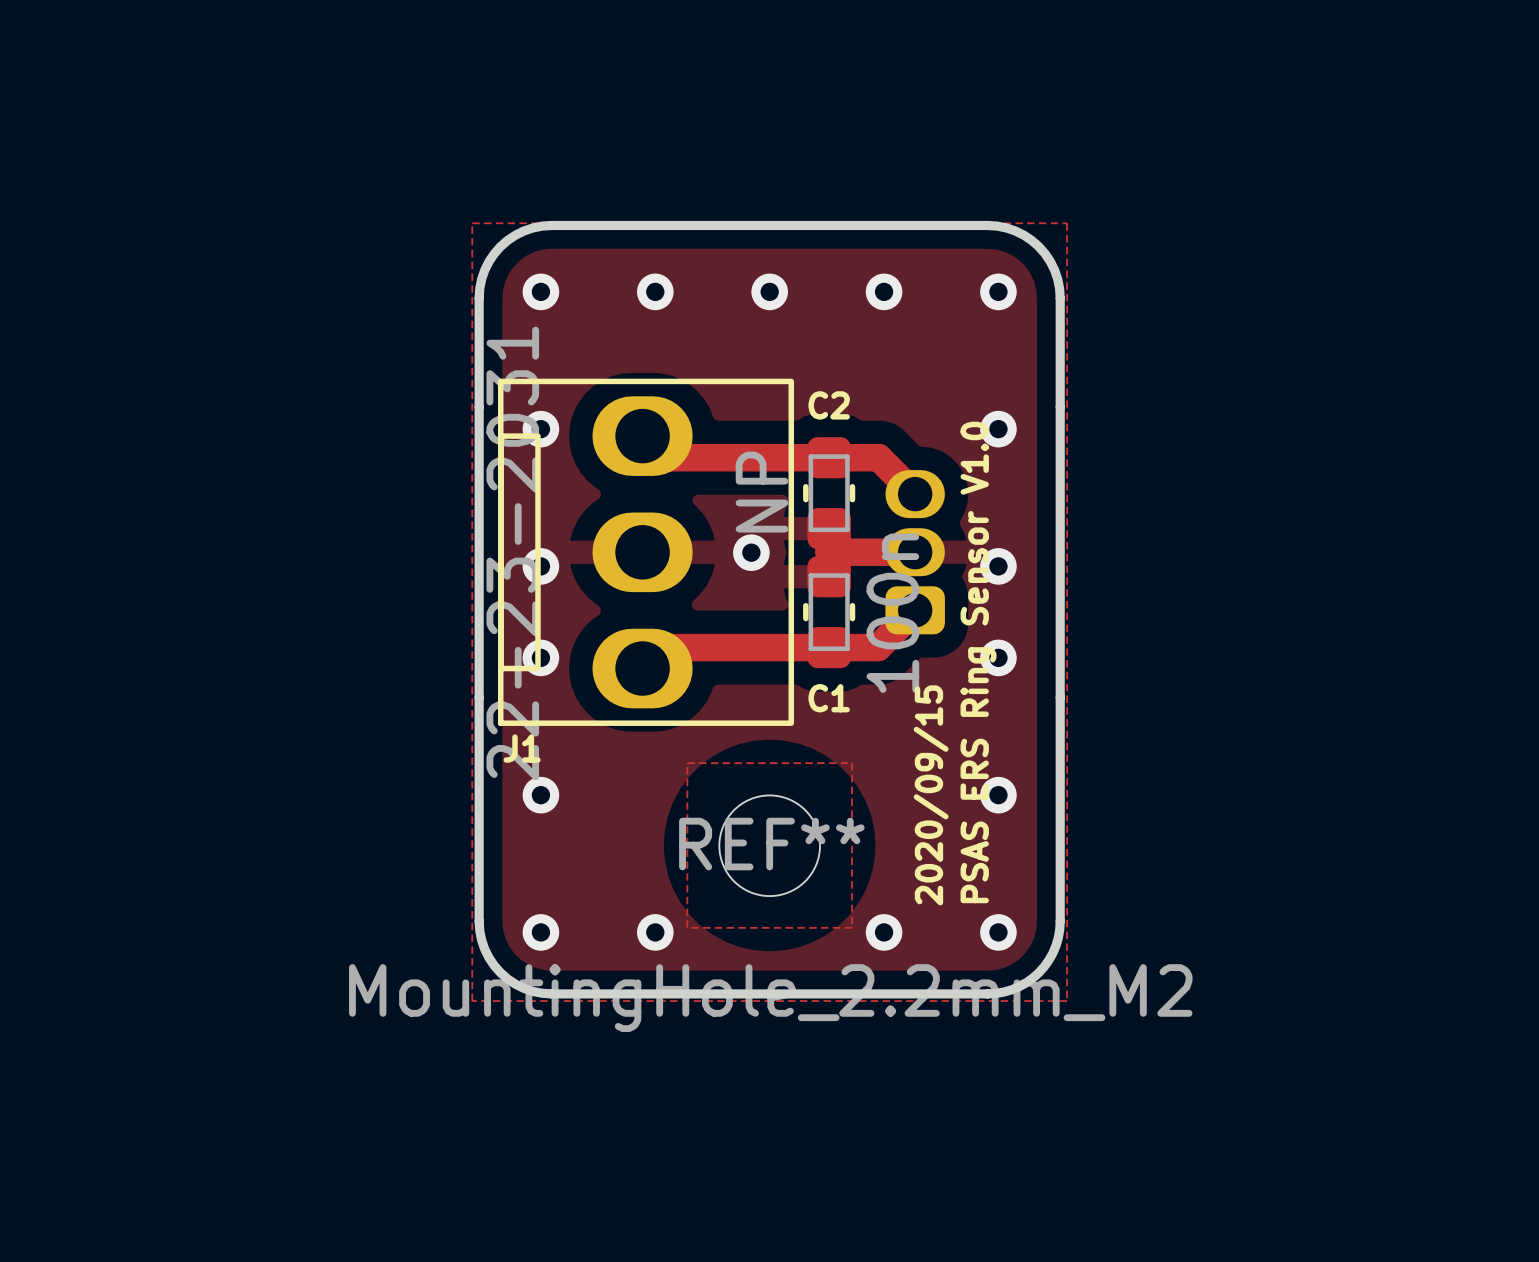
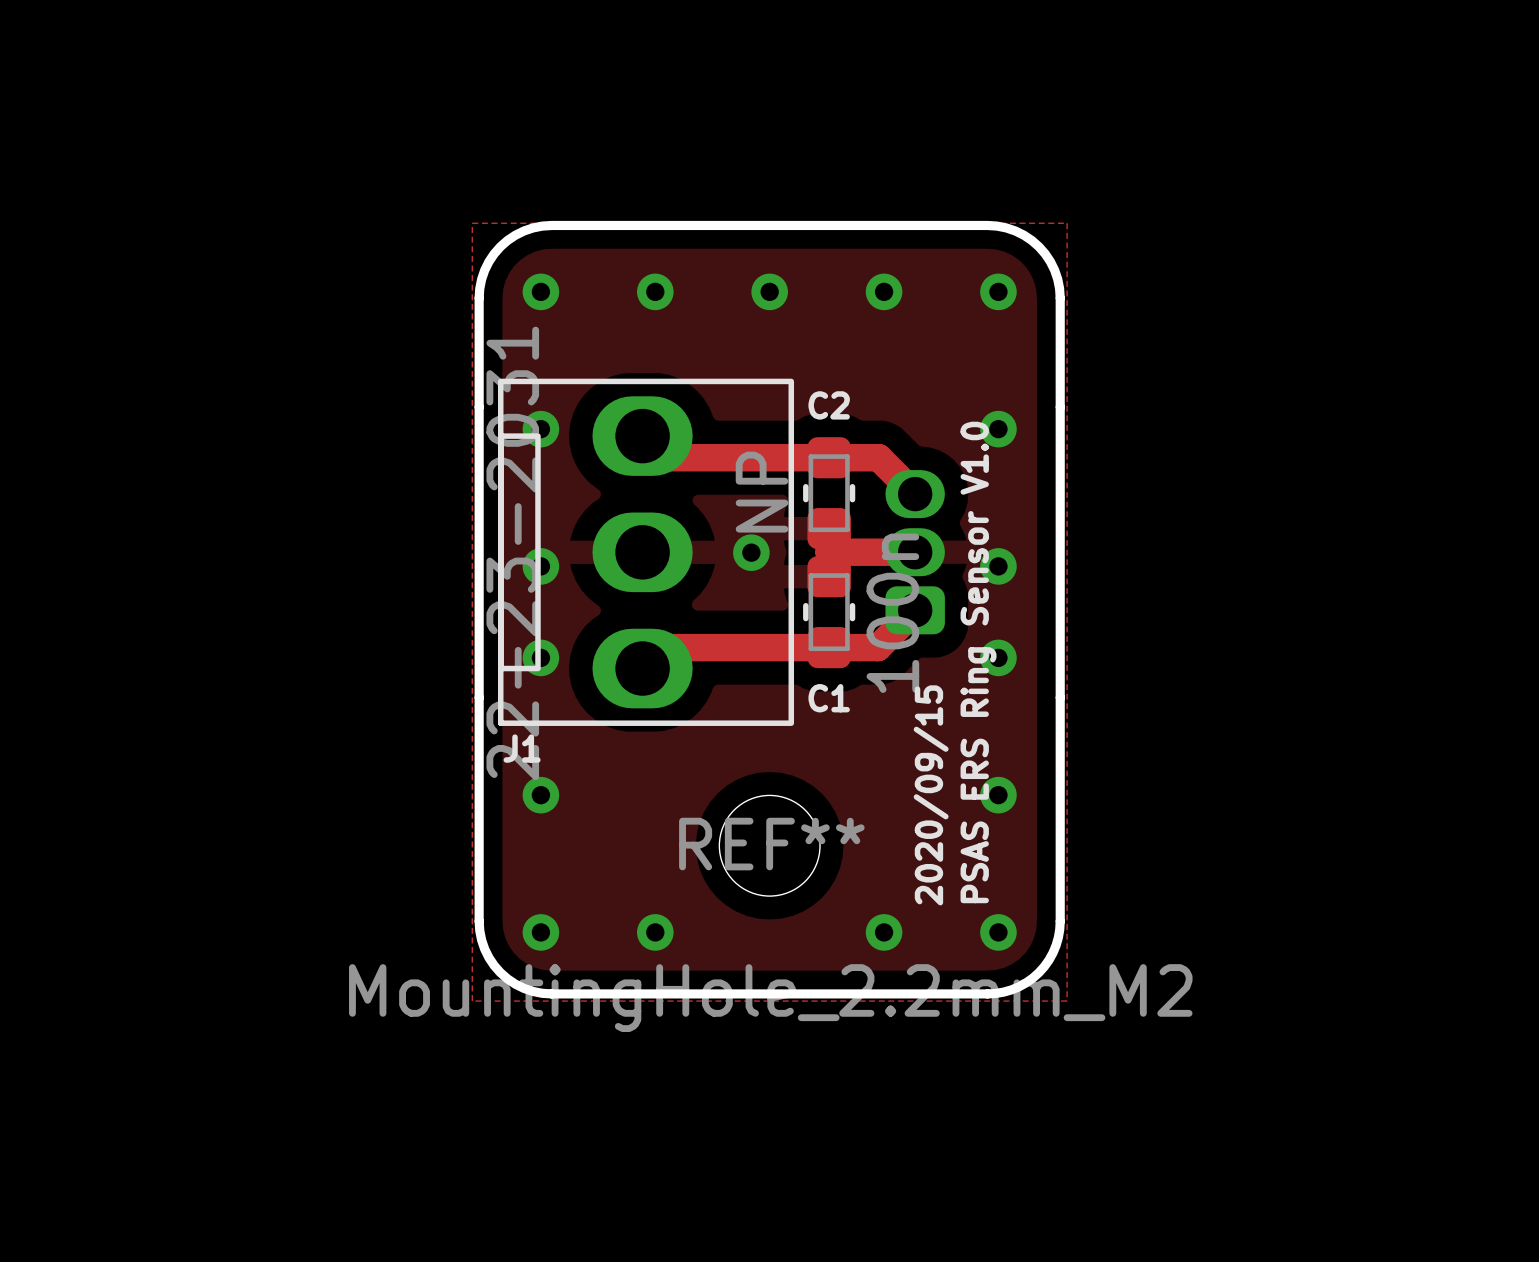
zone outline: (687, 763) (687, 927) (852, 927) (852, 763) (687, 763) -> none

